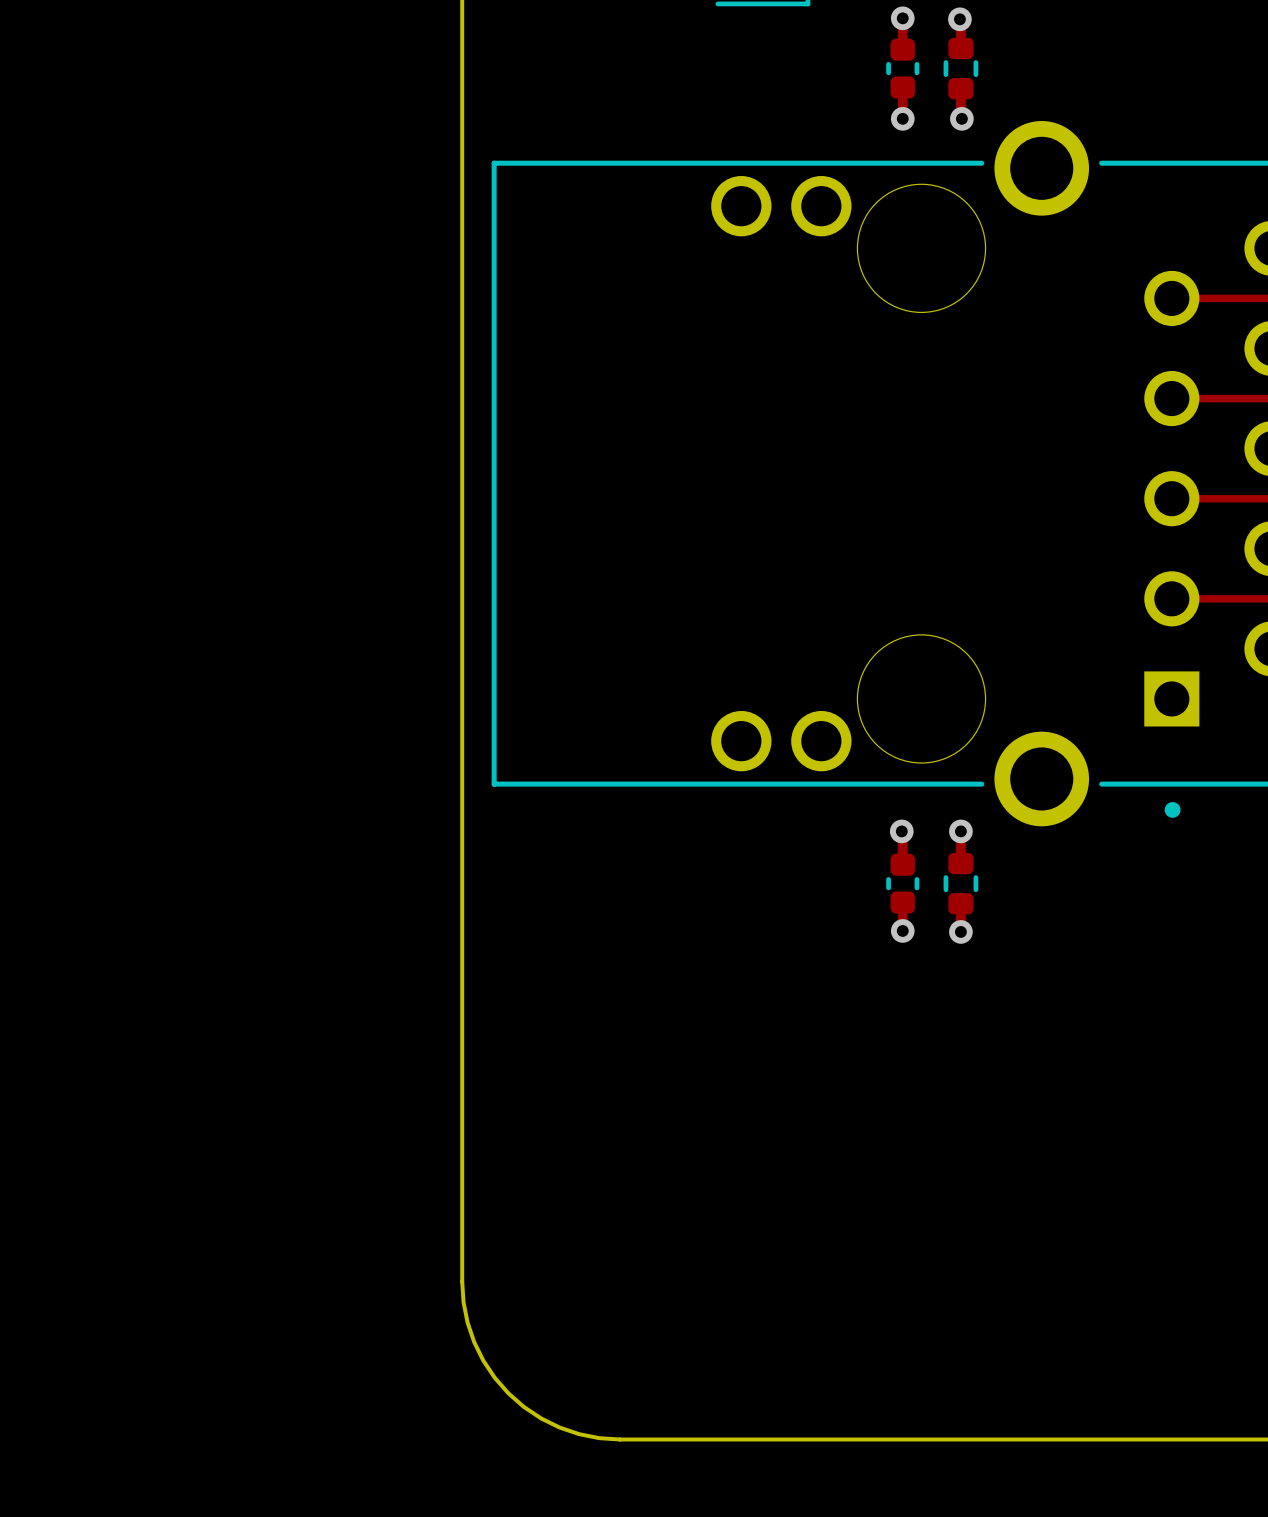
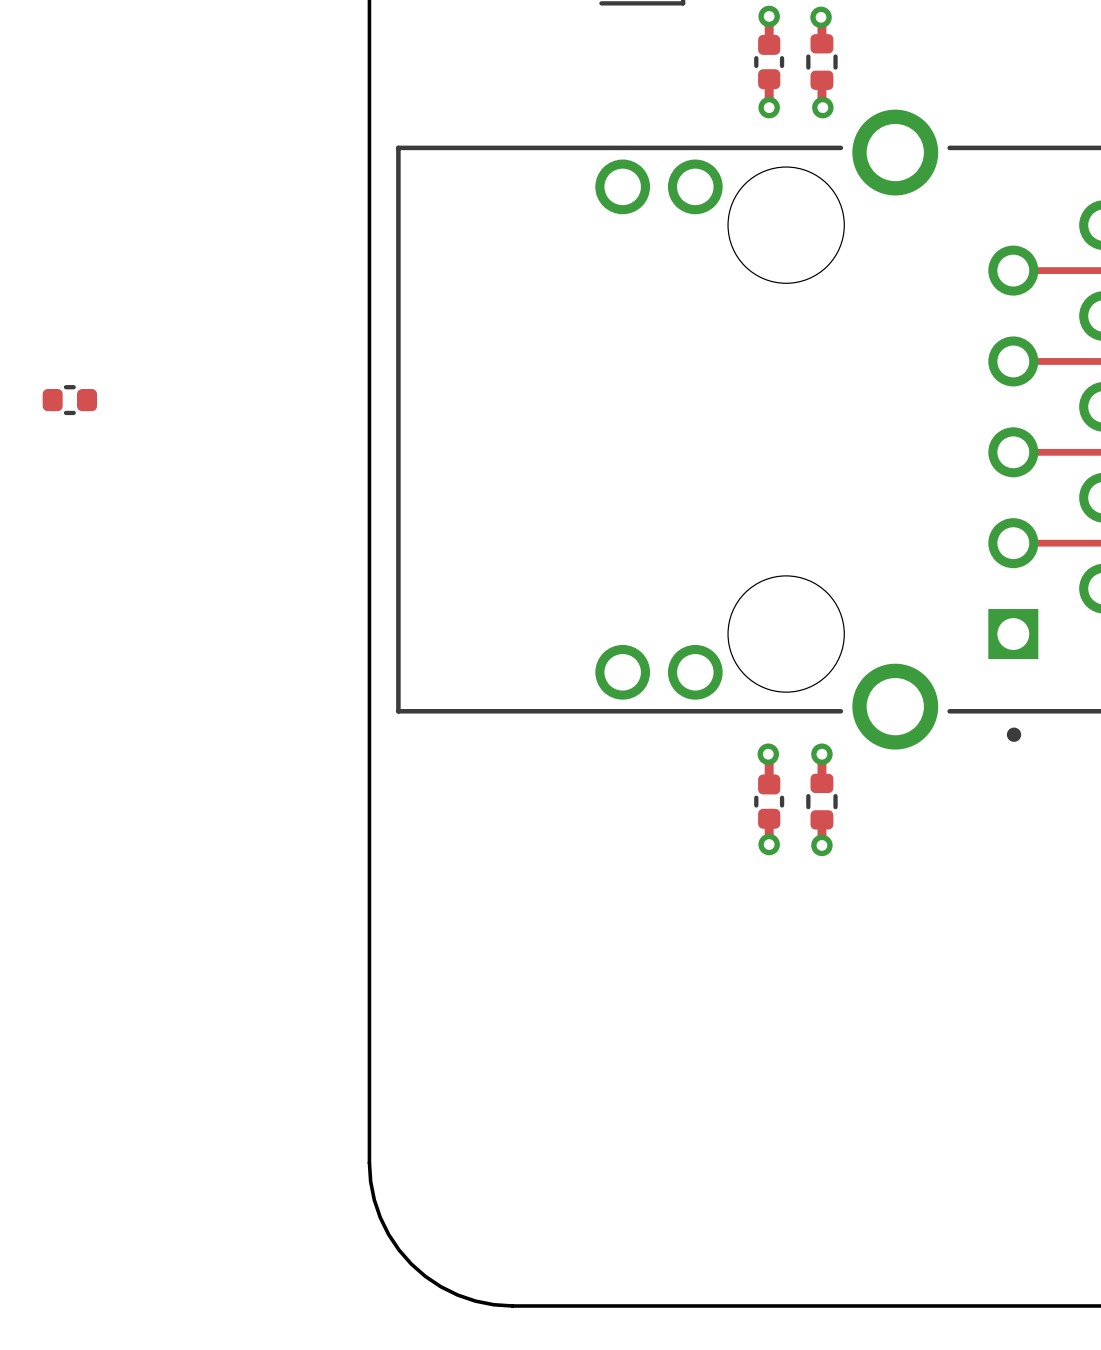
part: none -> (69, 400)

